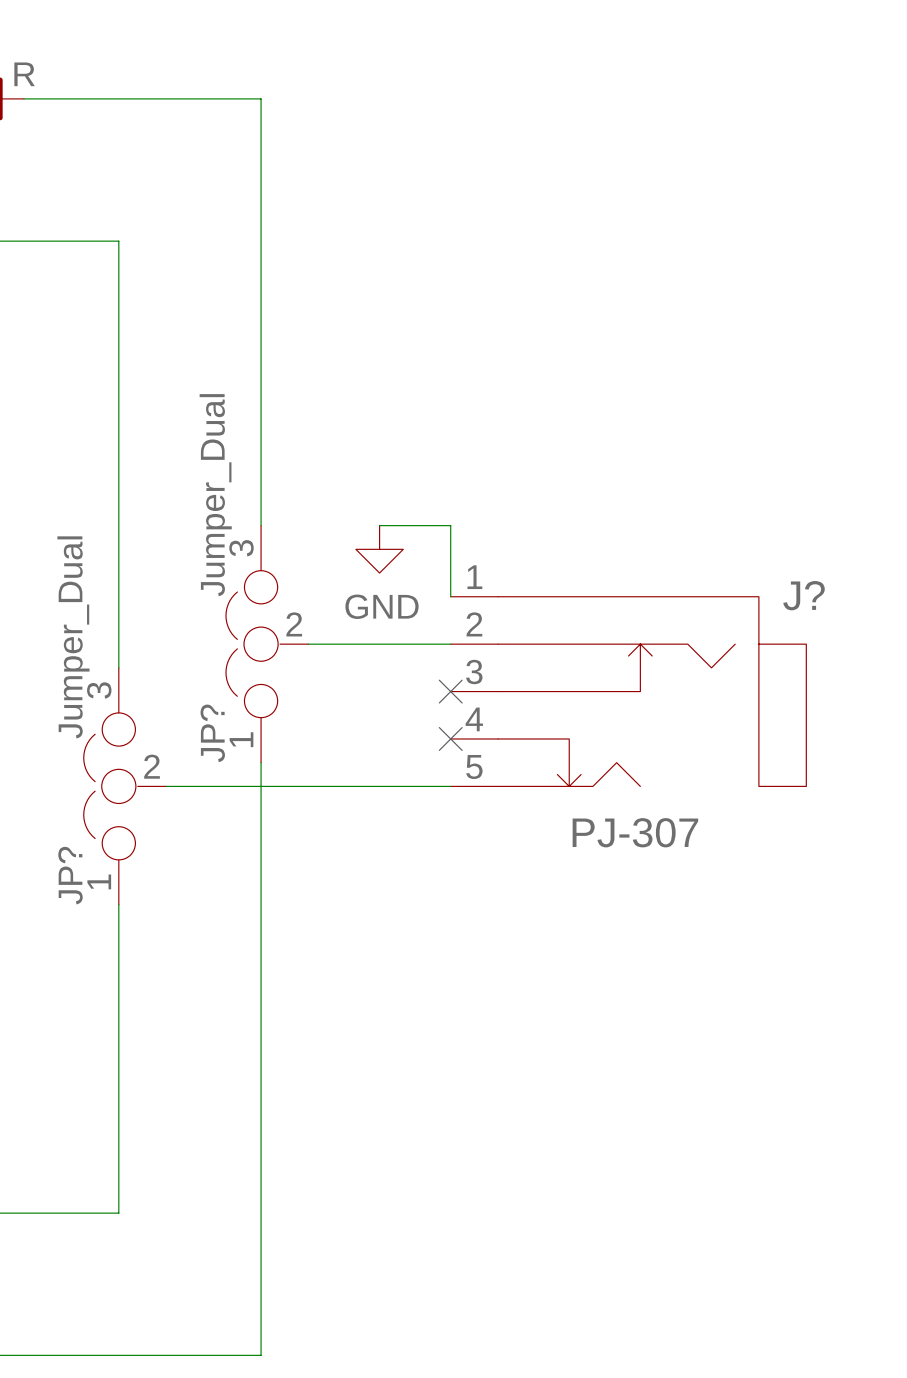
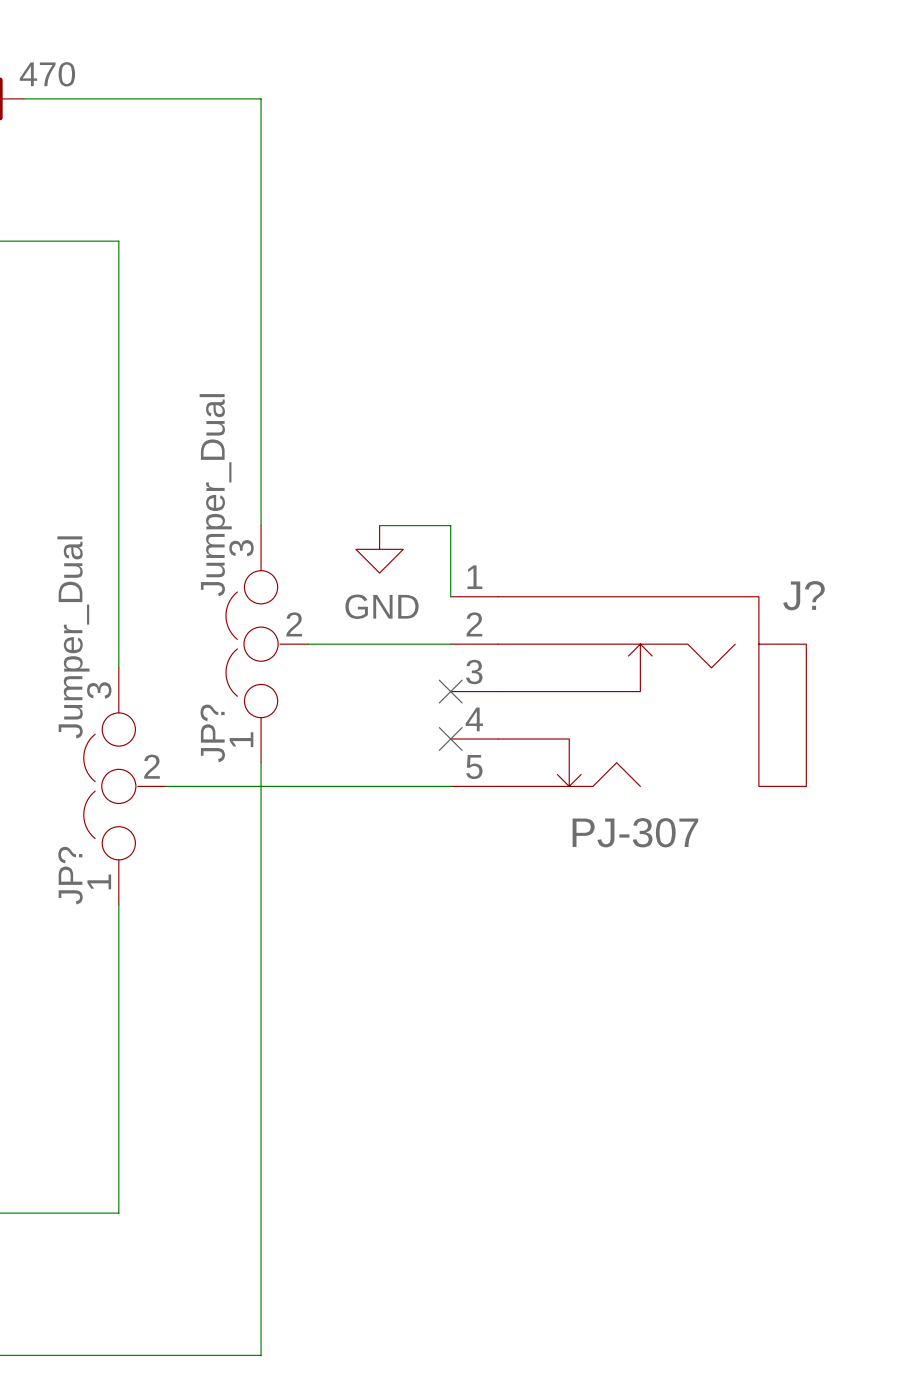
part value: R (24, 74) -> 470 (47, 74)

